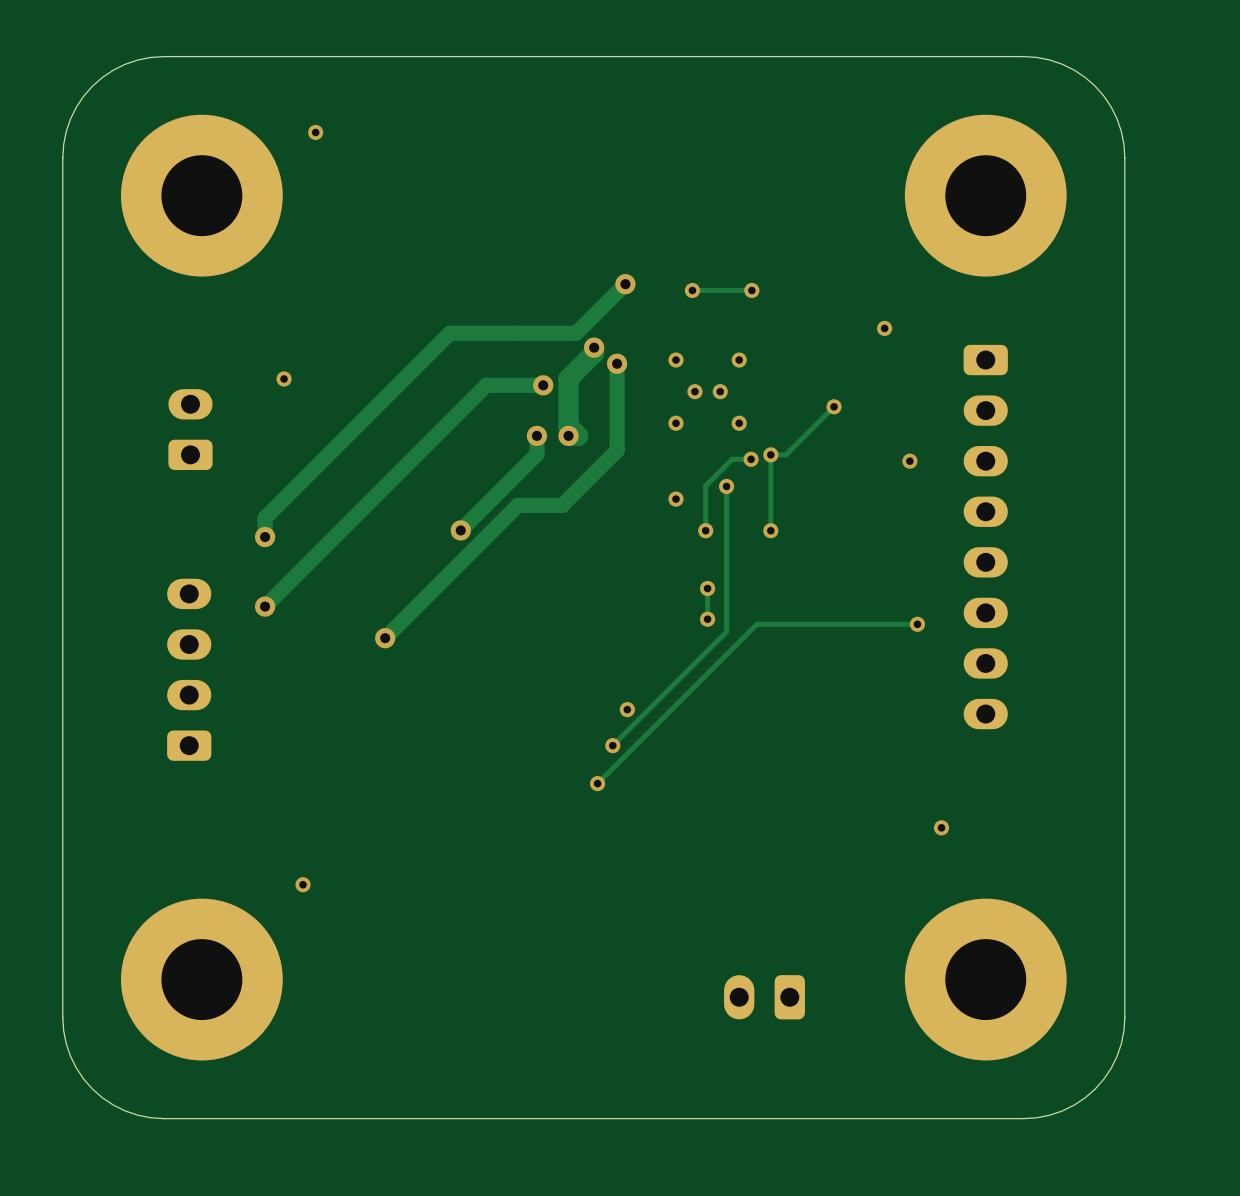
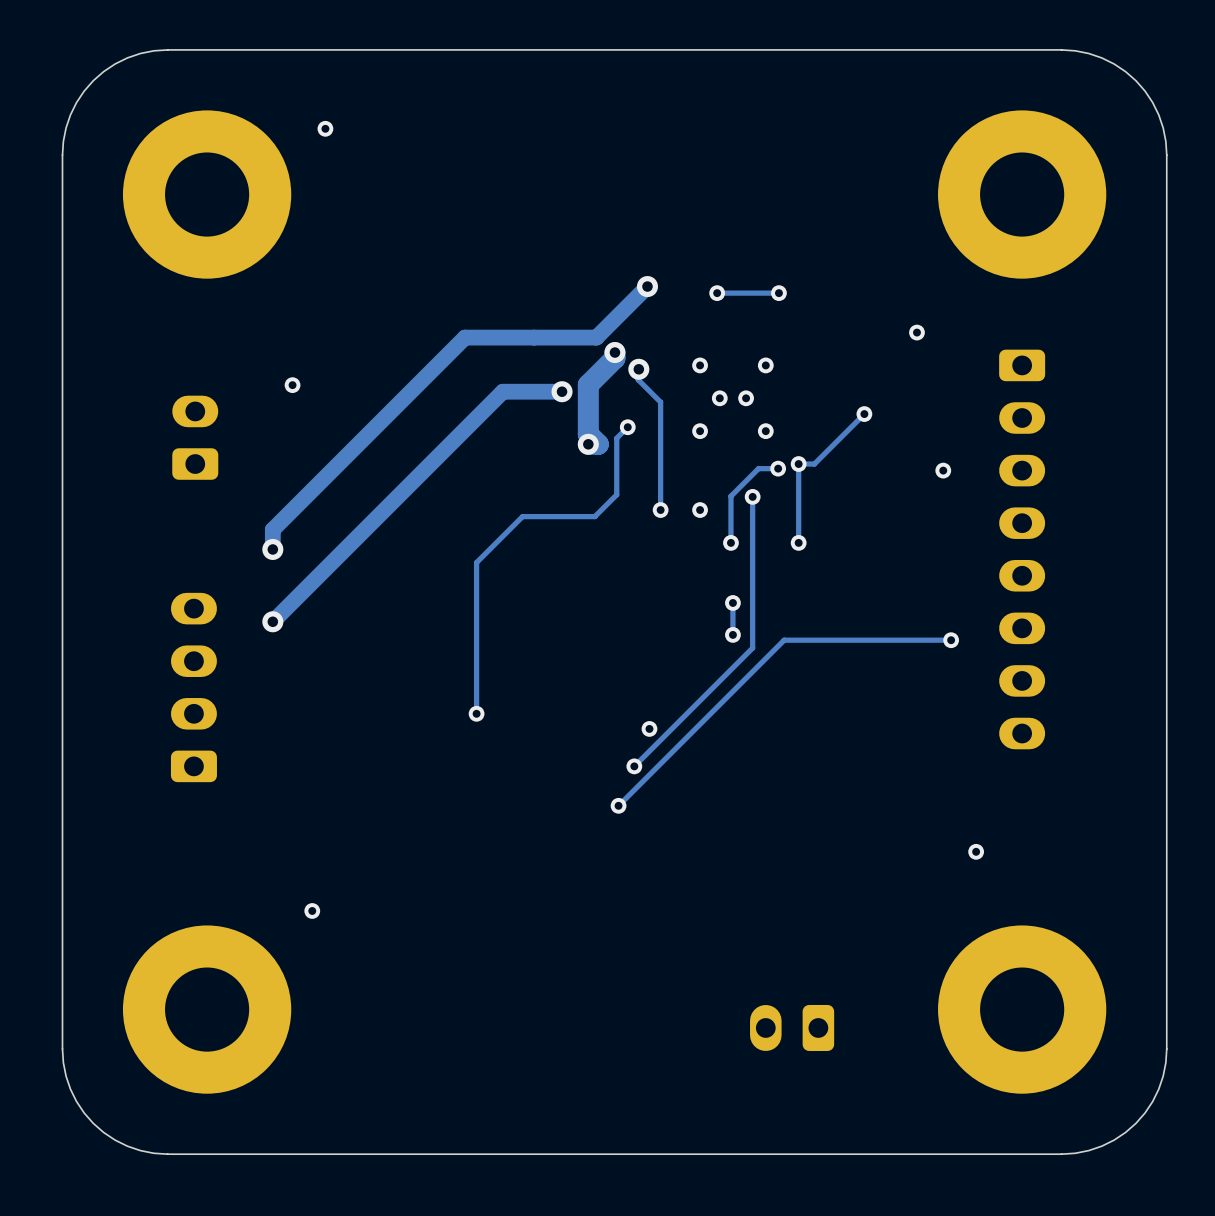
track: (617, 363) (617, 450) (562, 505) -> (627, 427) (616, 438) (616, 494) (594, 516) (581, 516)
track: none -> (638, 371) (638, 379) (660, 402) (660, 510)
via: none -> (627, 427)
track: (536, 435) (536, 454) (460, 530) -> none
via: (536, 435) -> none
via: none -> (660, 510)
track: (517, 505) (385, 638) -> (535, 516) (522, 516) (476, 562) (476, 713)
track width: thick (562, 505) (517, 505) -> thin (581, 516) (535, 516)
via: (460, 530) -> none
via: (385, 638) -> none
via: none -> (476, 713)

